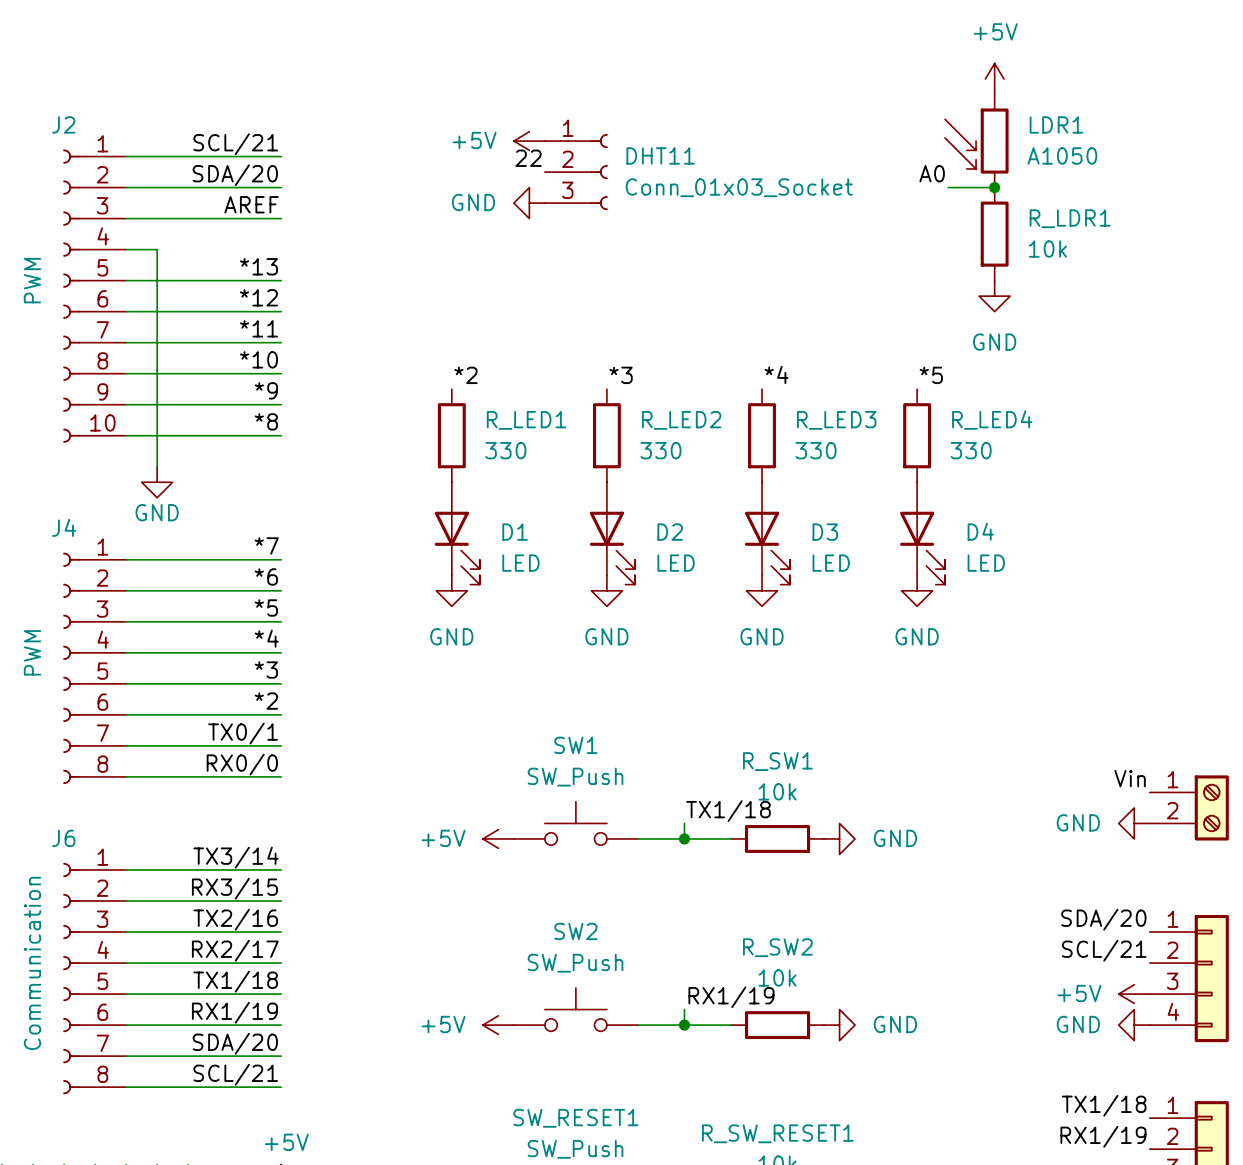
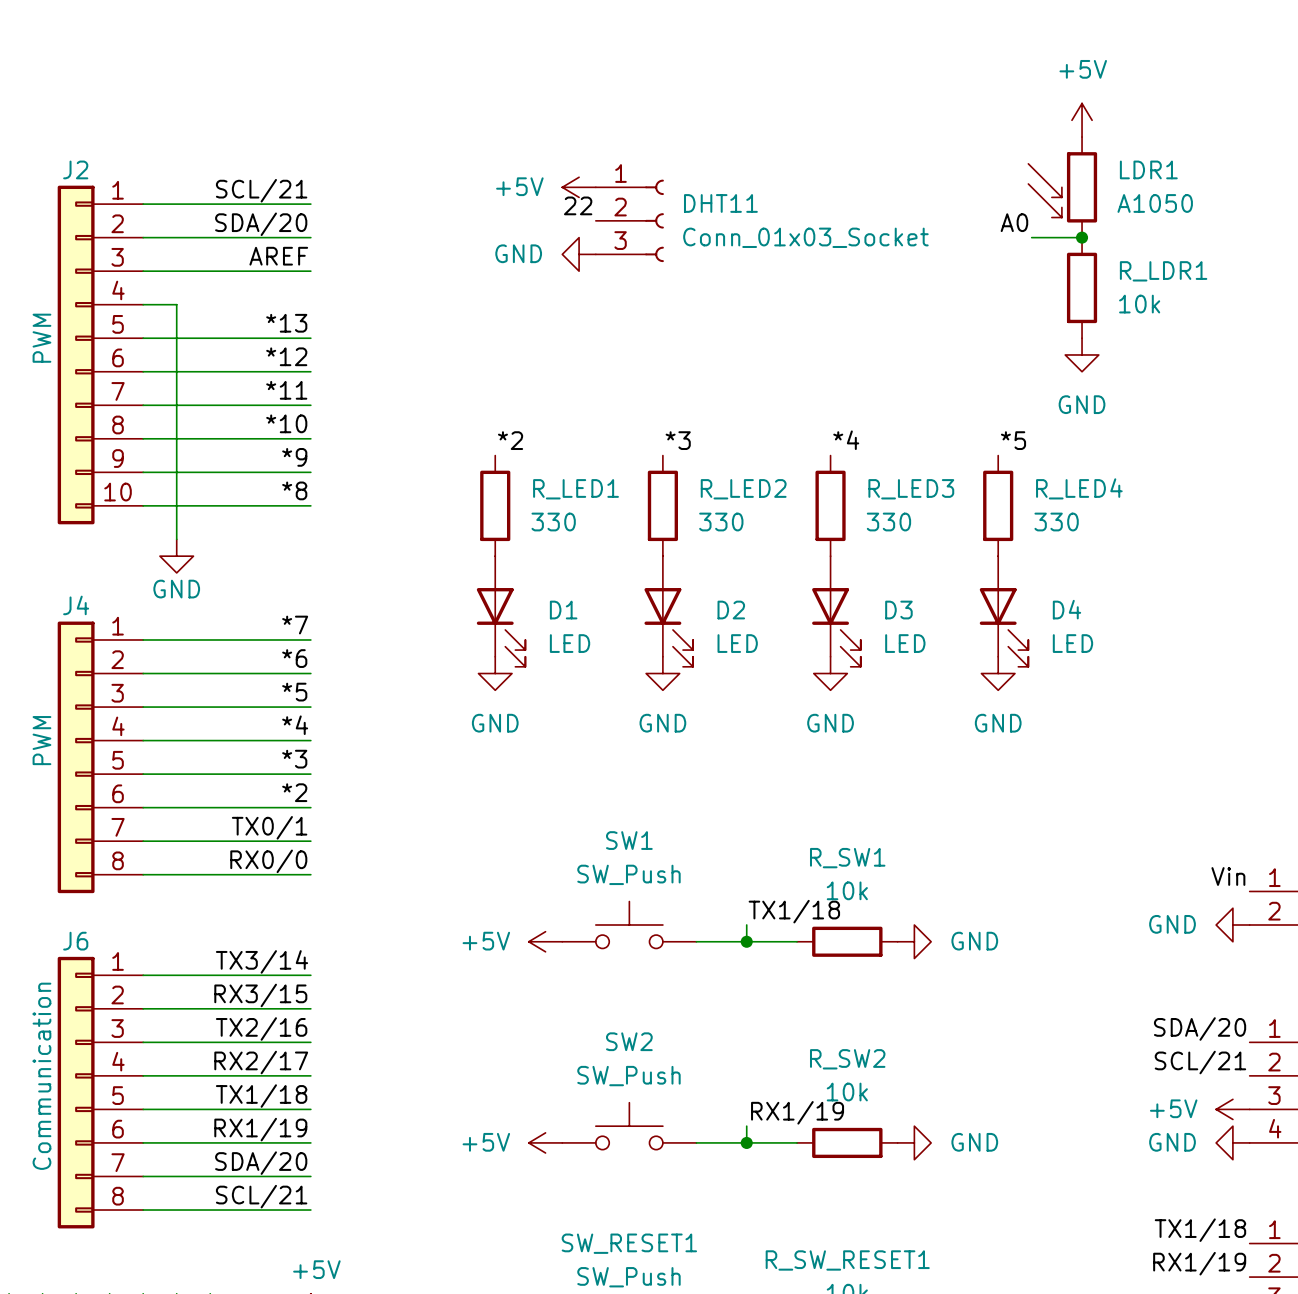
J2 symbol: [63, 149, 127, 443] -> [57, 185, 144, 525]
J4 symbol: [63, 552, 127, 785] -> [57, 621, 144, 894]
J6 symbol: [63, 862, 127, 1095] -> [57, 956, 144, 1229]

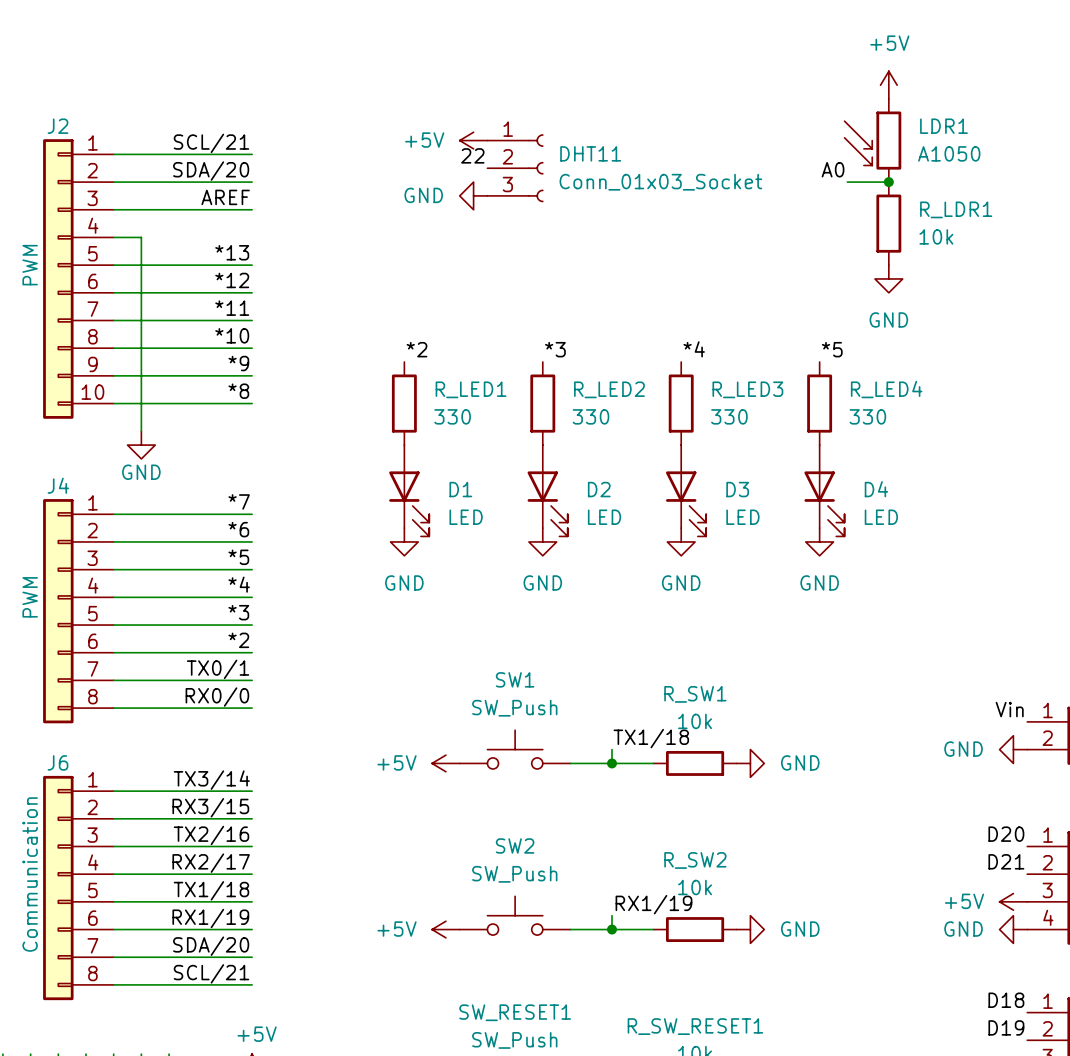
label: SDA/20 (1200, 1028) -> D20 (1006, 834)
label: SCL/21 (1200, 1062) -> D21 (1006, 861)
label: TX1/18 (1200, 1230) -> D18 (1006, 1000)
label: RX1/19 (1199, 1263) -> D19 (1006, 1027)

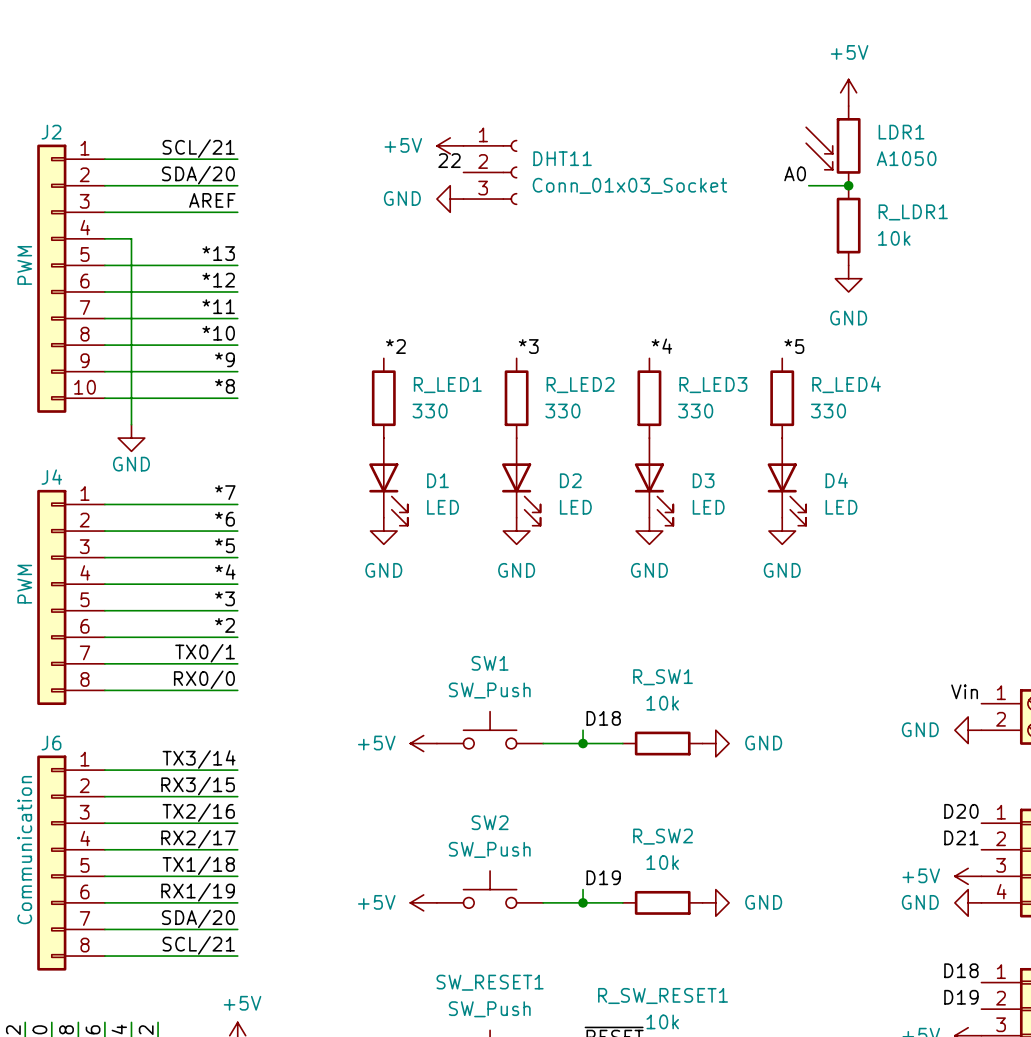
label: TX1/18 (651, 738) -> D18 (603, 718)
label: RX1/19 (653, 904) -> D19 (603, 877)

